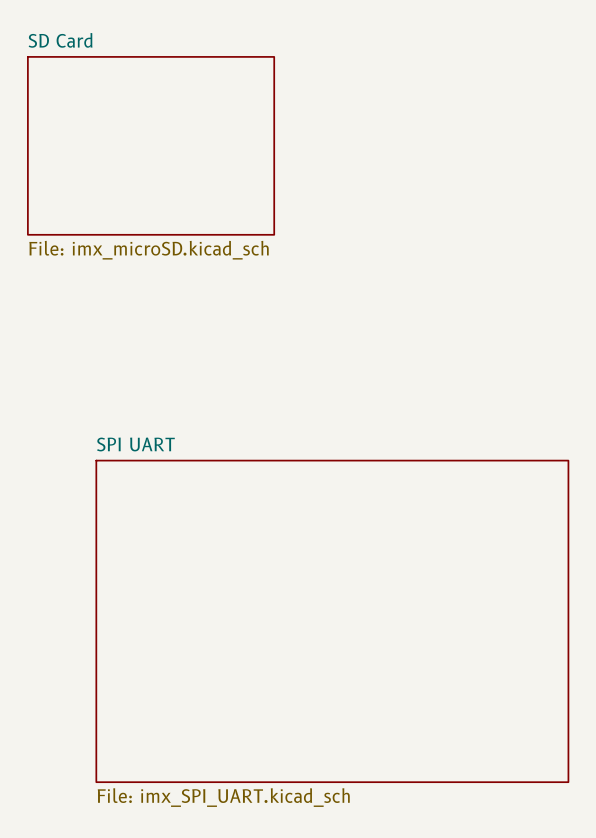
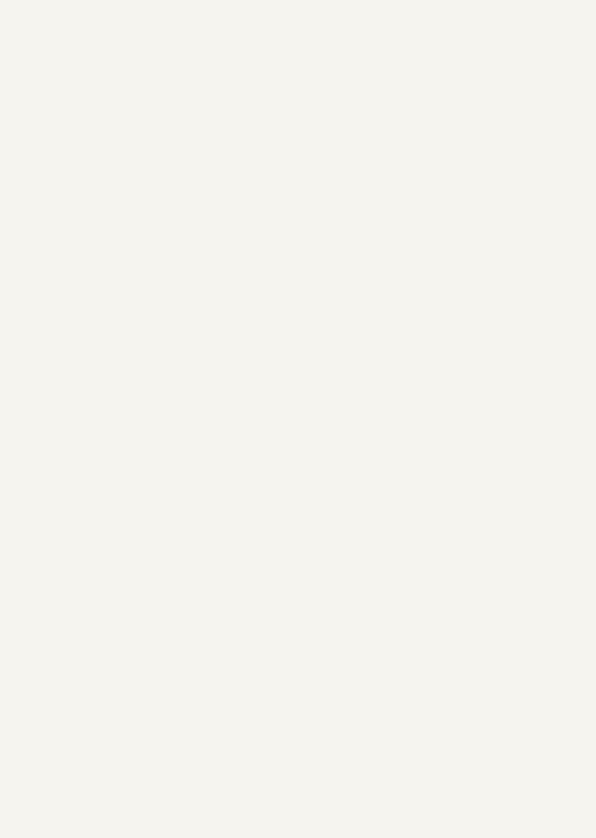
sheet SD Card: File: imx_microSD.kicad_sch (151, 145) -> none
sheet SPI UART: File: imx_SPI_UART.kicad_sch (332, 621) -> none

